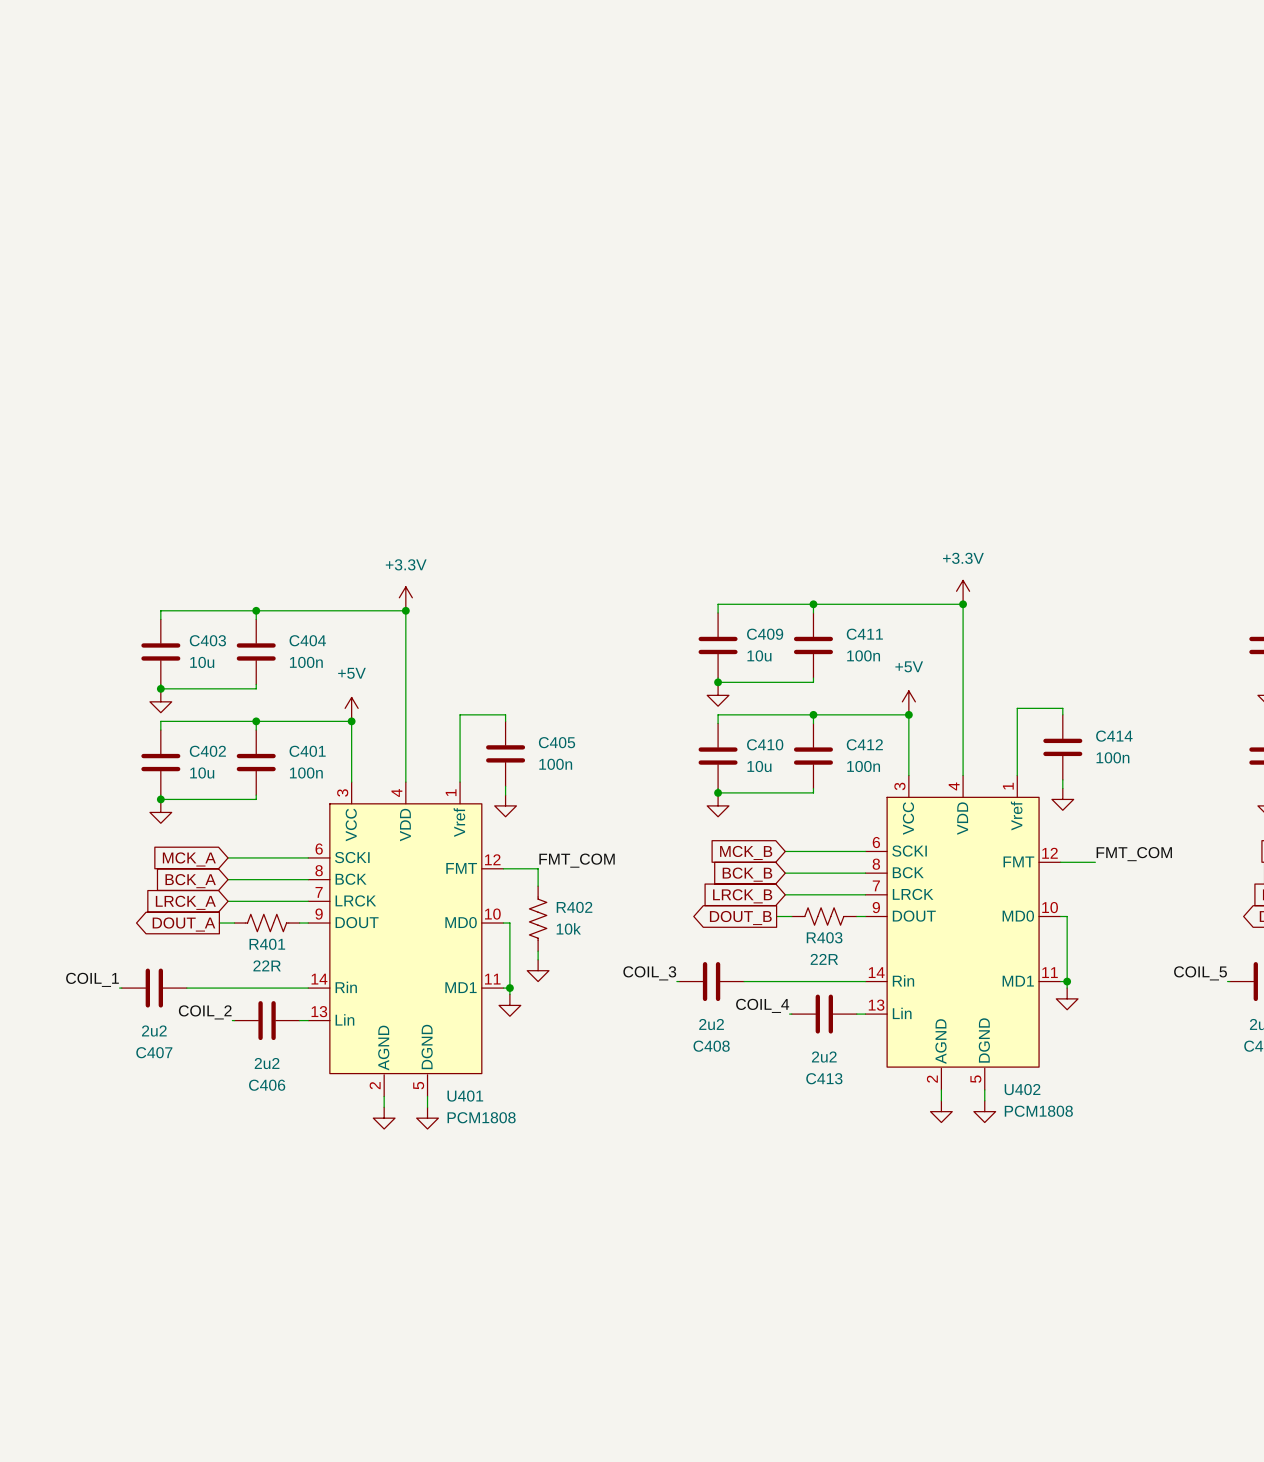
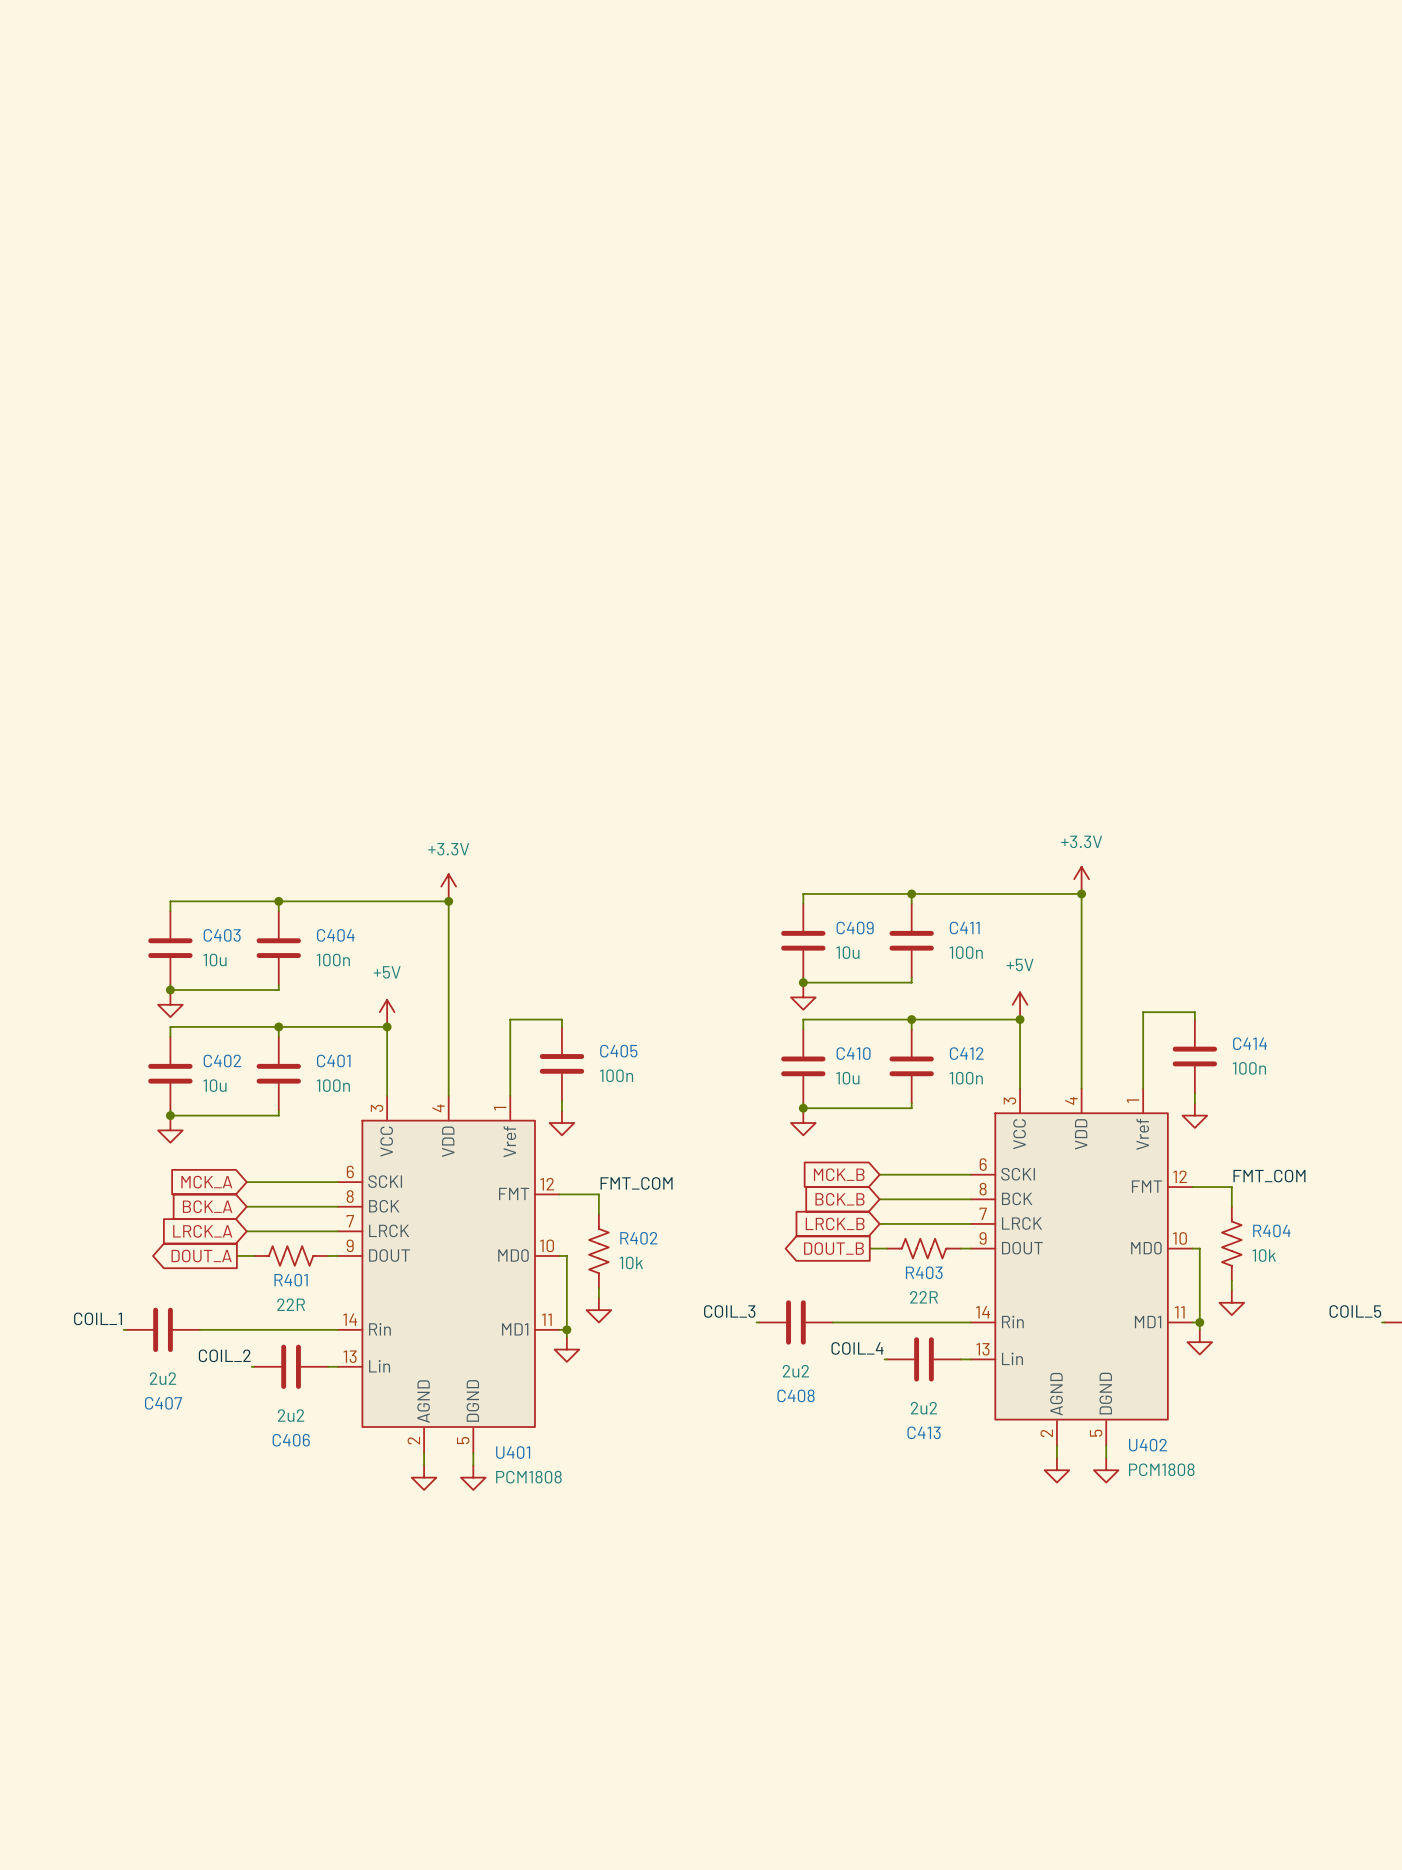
wire: none -> (1231, 1187) (1231, 1206)
R404: none -> 10k (1231, 1243)
wire: none -> (1231, 1280) (1231, 1290)
power symbol: none -> (1231, 1302)

